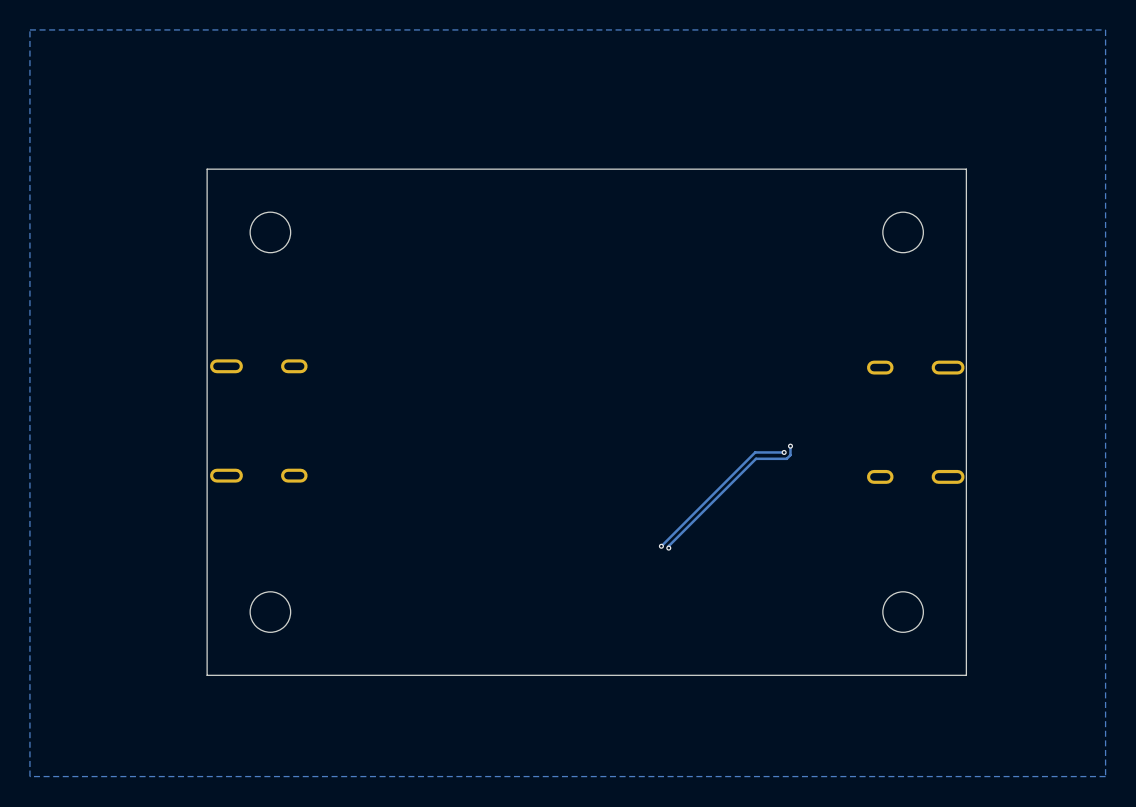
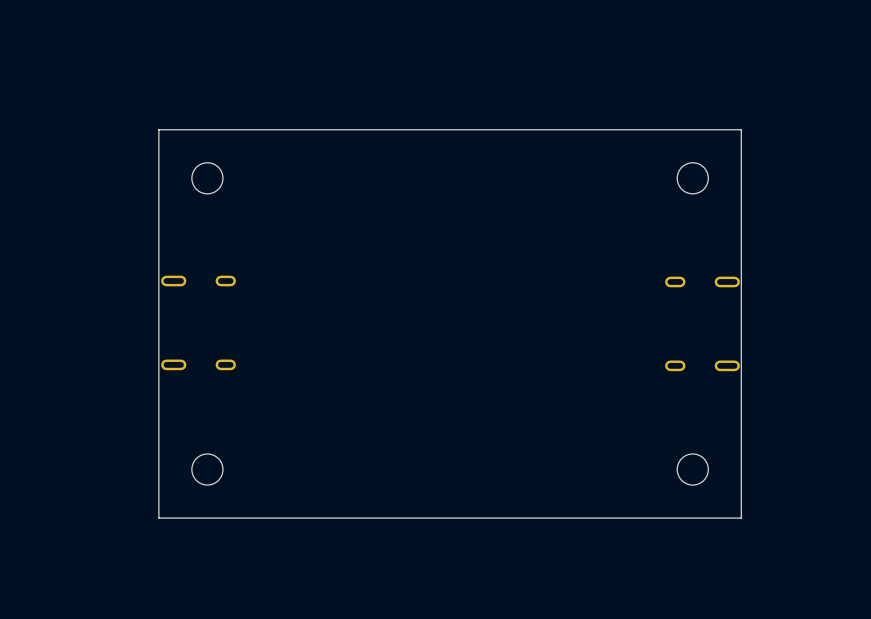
zone outline: (1105, 29) (29, 29) (29, 776) (1105, 776) (1105, 29) -> none
track: (790, 446) (790, 455) (786, 458) (756, 458) (668, 548) -> none
via: (790, 446) -> none
track: (784, 452) (755, 452) (661, 546) -> none
via: (784, 452) -> none
via: (661, 546) -> none
via: (668, 548) -> none

